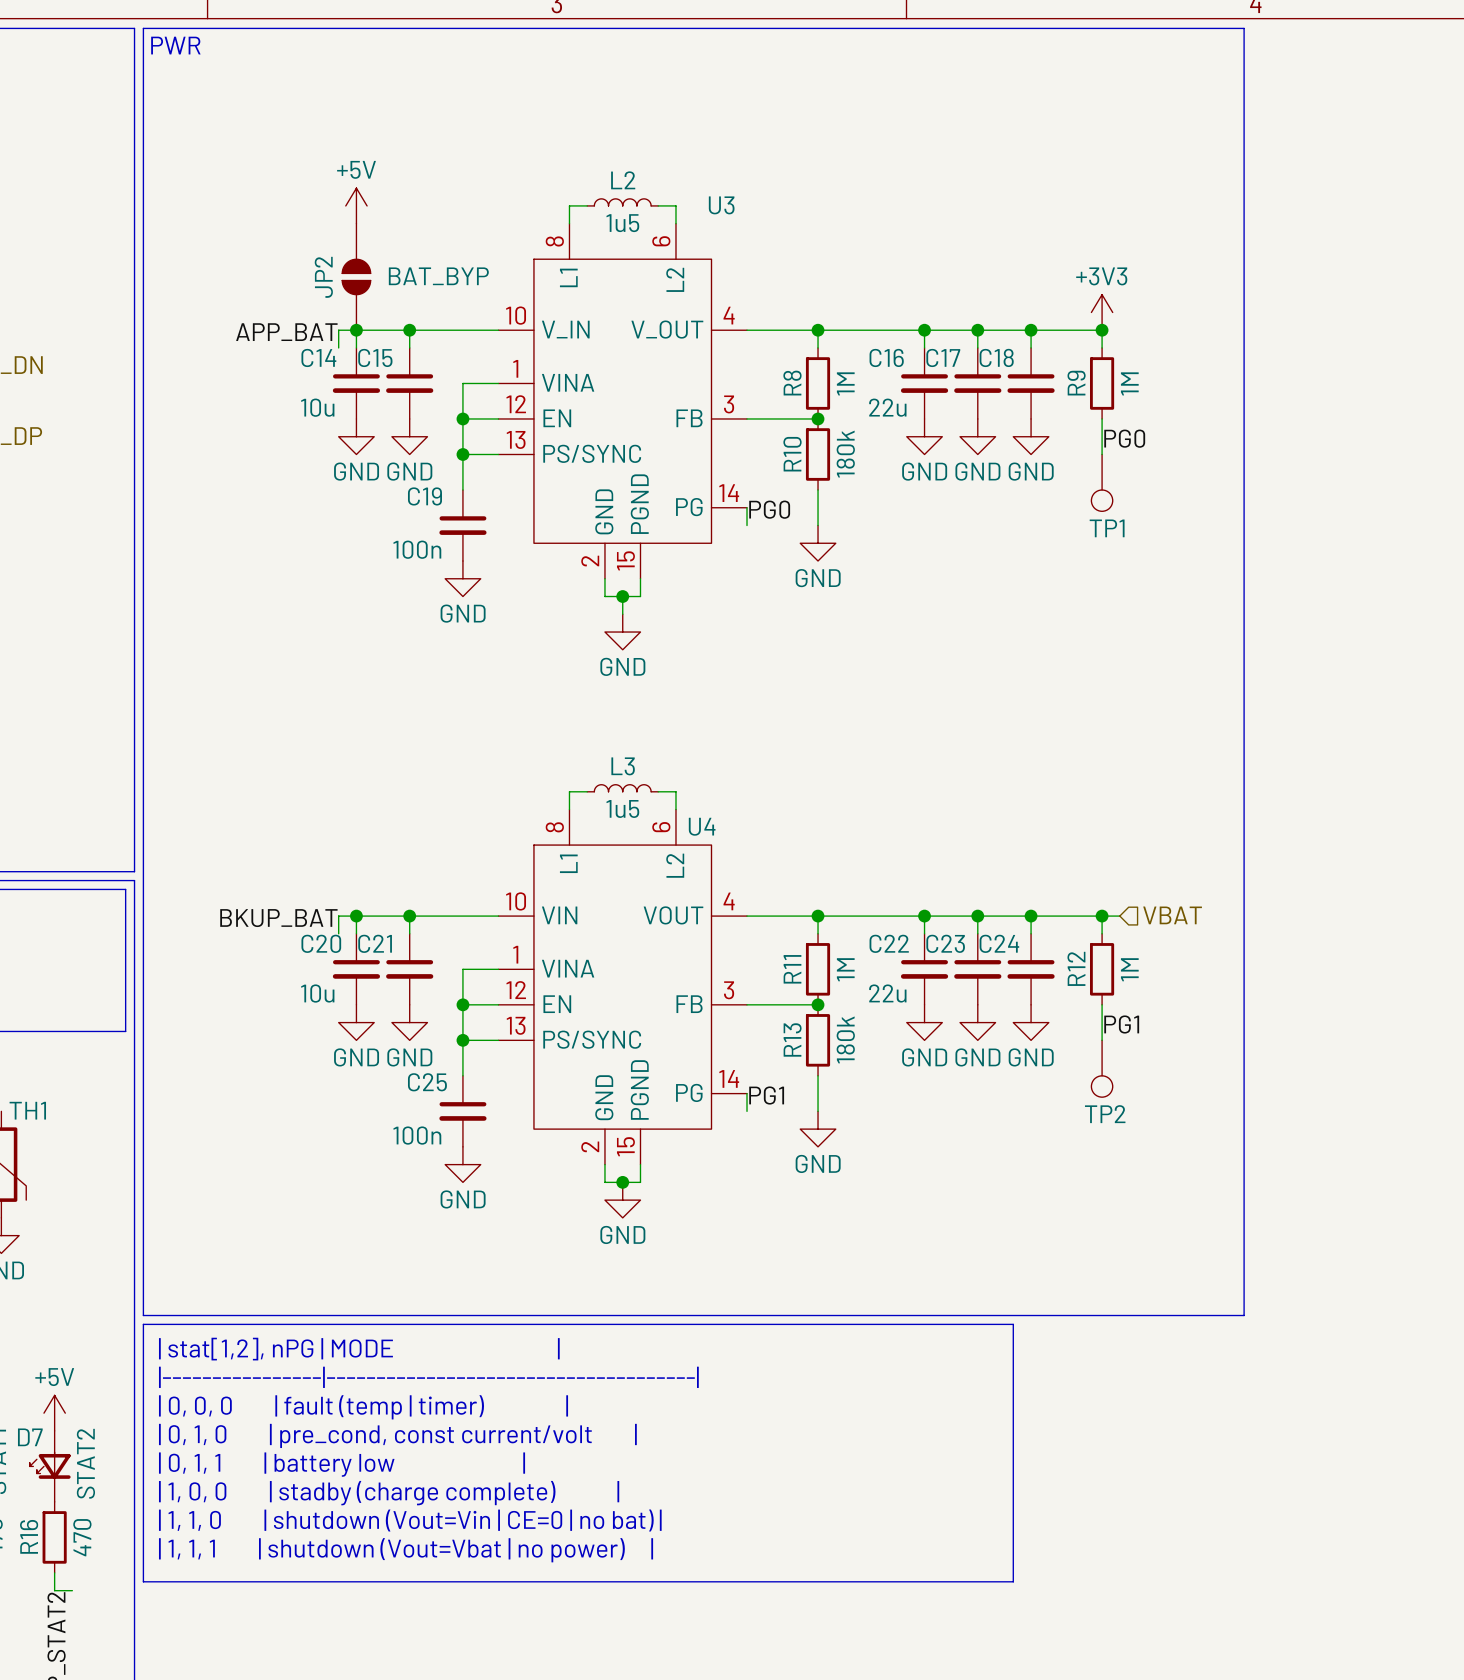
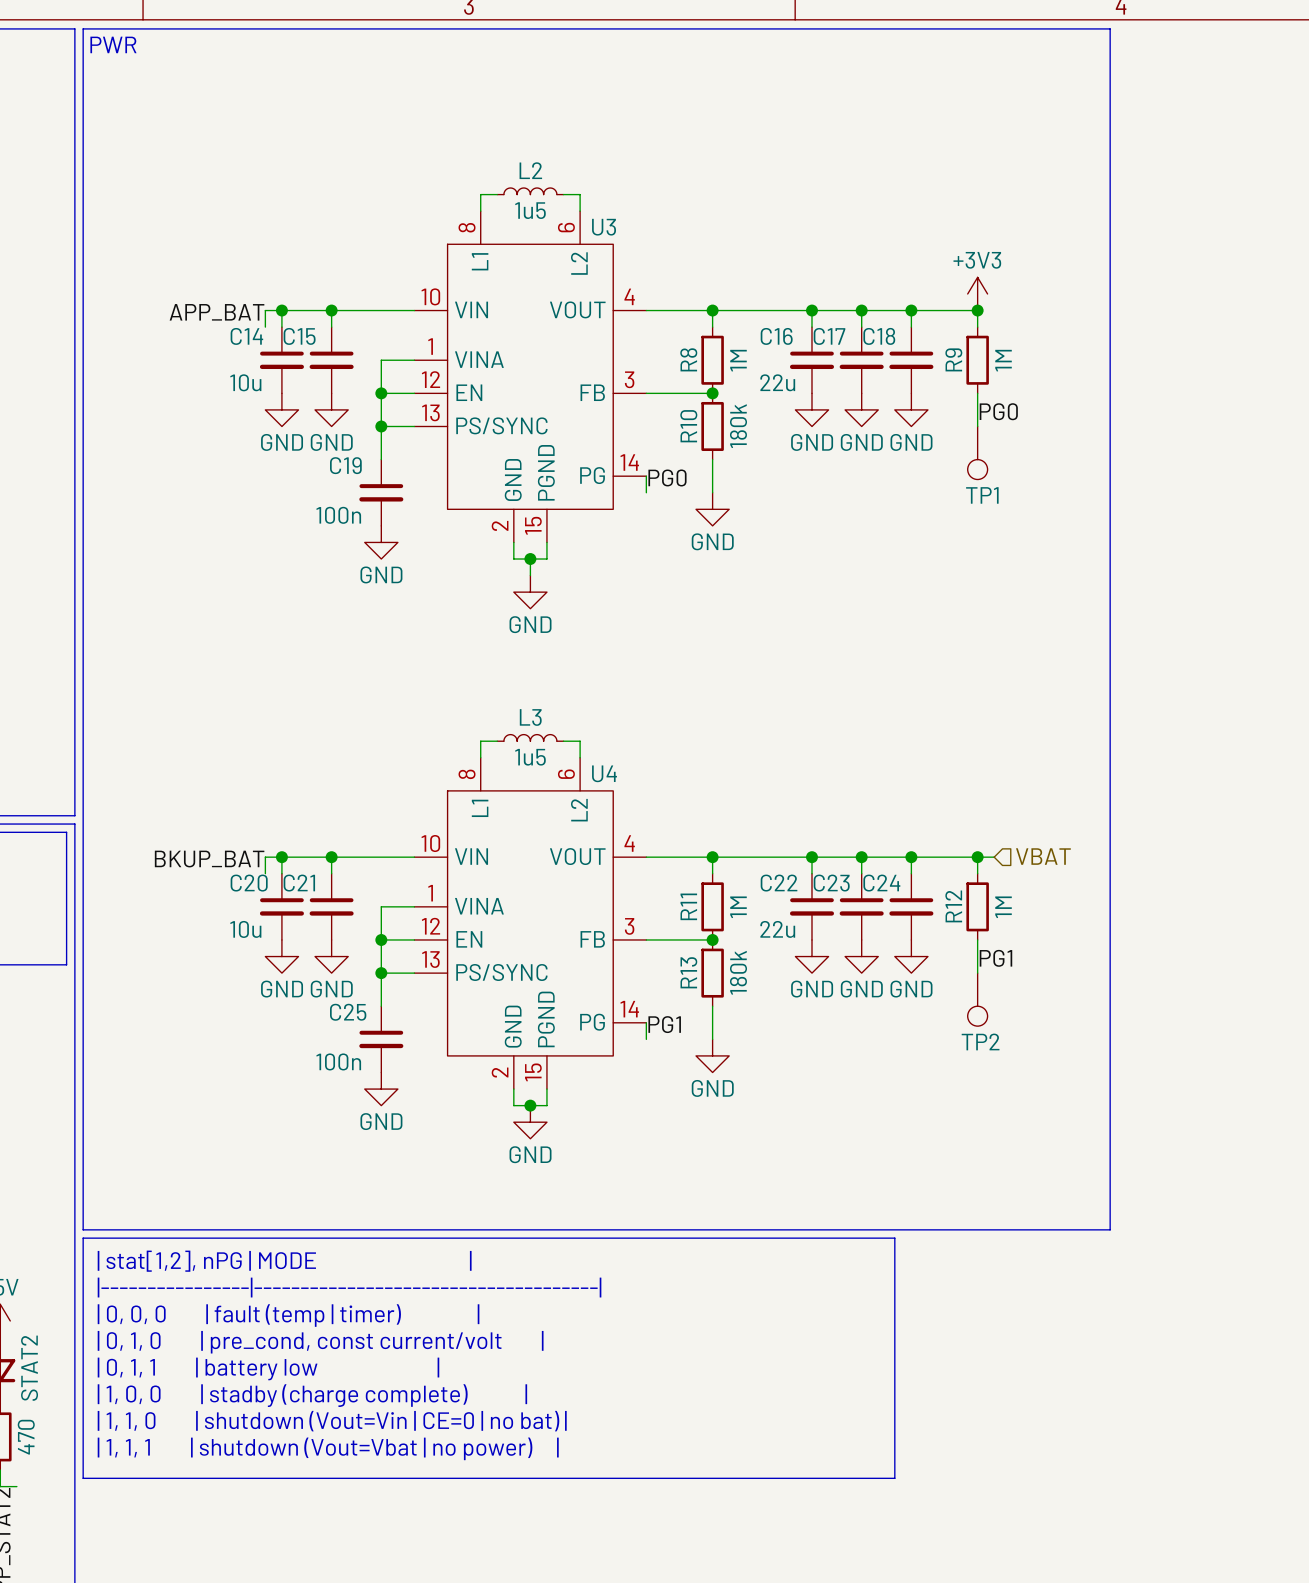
power symbol: +5V (356, 205) -> none
U3 name position: U3 (721, 205) -> U3 (604, 227)
JP2: BAT_BYP (356, 276) -> none
U3 pin name: V_IN (565, 329) -> VIN (471, 309)
U3 pin name: V_OUT (667, 329) -> VOUT (577, 309)

